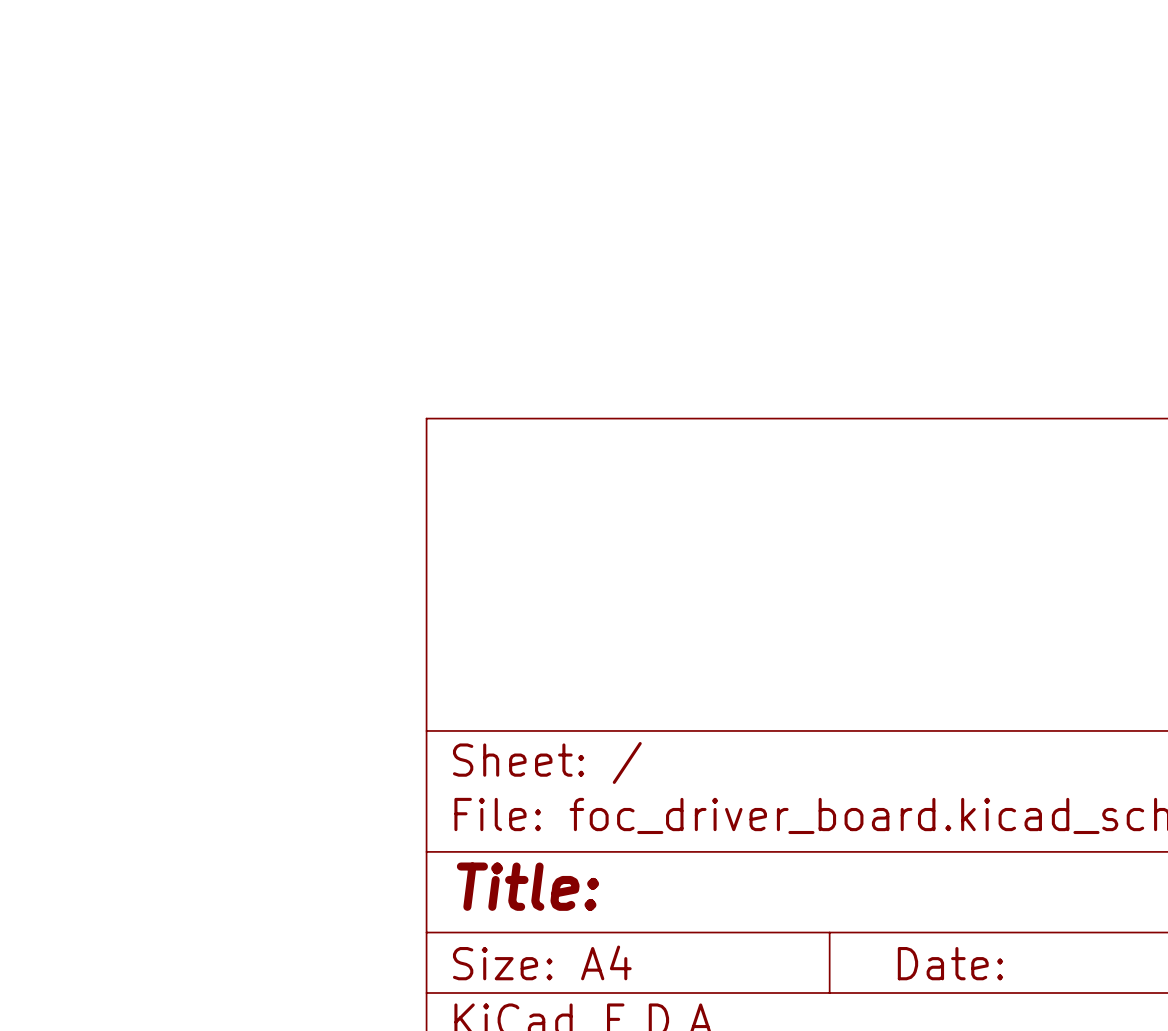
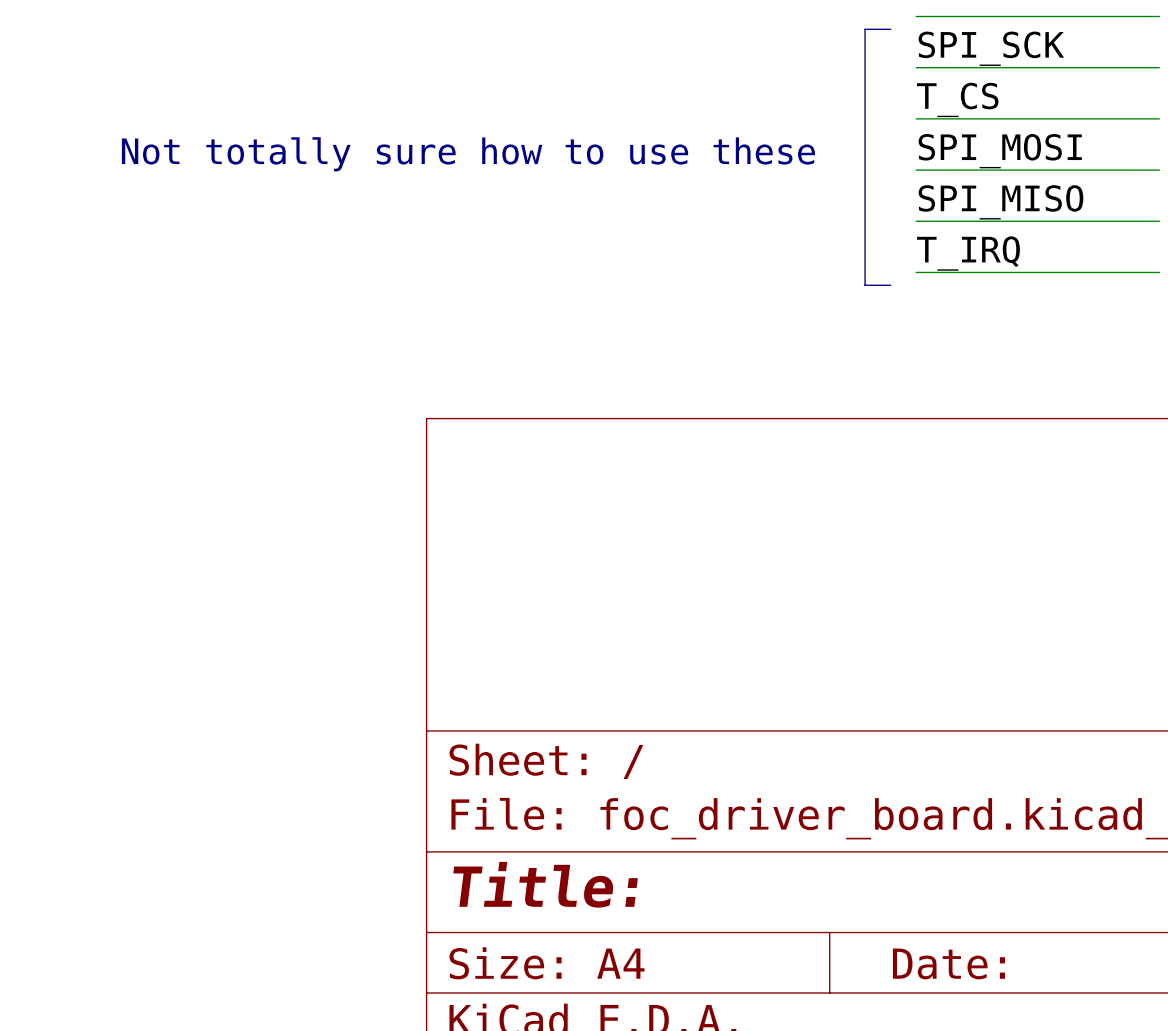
wire: none -> (916, 16) (1159, 16)
line: none -> (890, 29) (865, 29) (865, 285) (890, 285)
label: none -> SPI_SCK (991, 48)
wire: none -> (916, 67) (1159, 67)
label: none -> T_CS (957, 99)
wire: none -> (916, 118) (1159, 118)
label: none -> SPI_MOSI (1000, 151)
text: none -> Not totally sure how to use these (468, 154)
wire: none -> (916, 170) (1159, 170)
label: none -> SPI_MISO (1000, 202)
wire: none -> (916, 221) (1159, 221)
label: none -> T_IRQ (968, 253)
wire: none -> (916, 272) (1159, 272)

